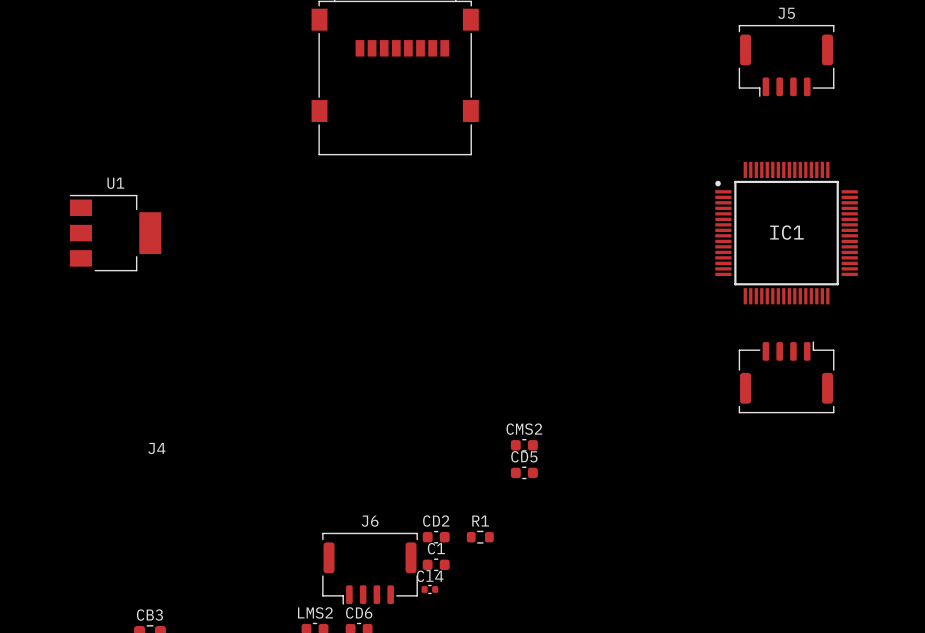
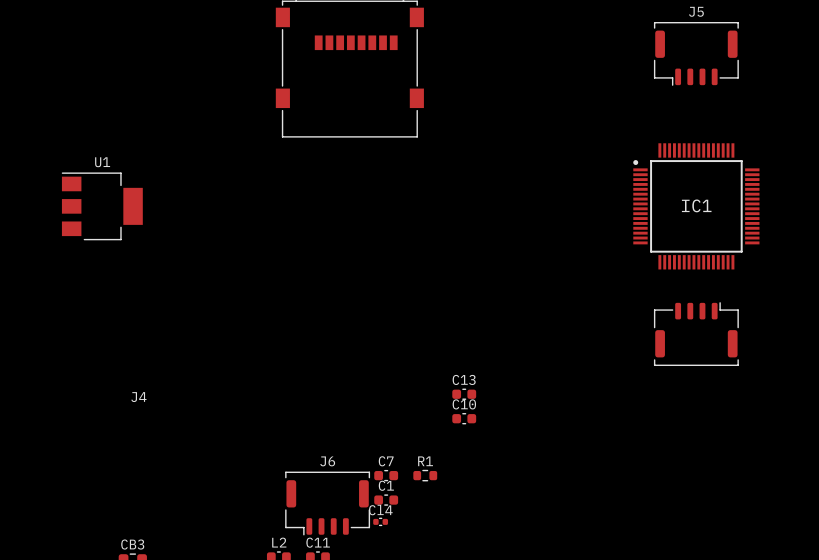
CMS2 name: CMS2 (524, 429) -> C13 (464, 379)
CD5 name: CD5 (524, 456) -> C10 (464, 404)
CD2 name: CD2 (436, 521) -> C7 (386, 461)
LMS2 name: LMS2 (315, 612) -> L2 (279, 542)
CD6 name: CD6 (359, 612) -> C11 (318, 542)

